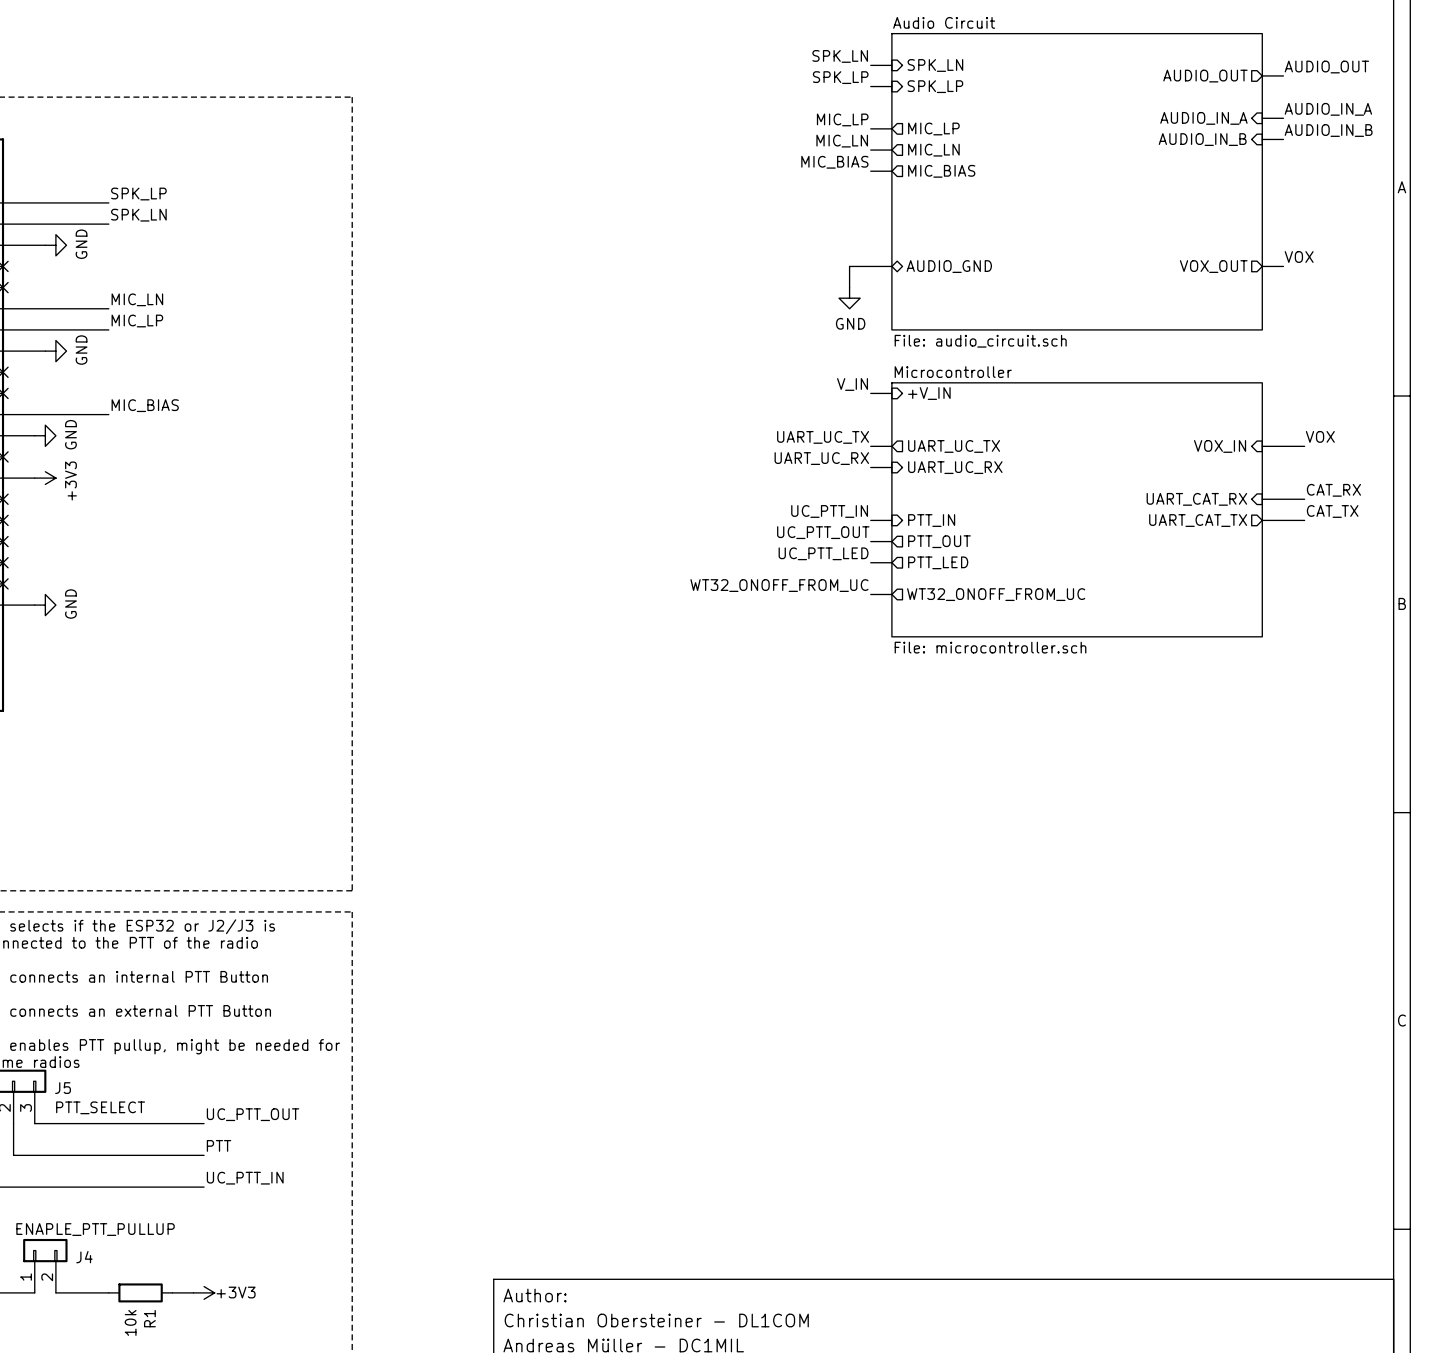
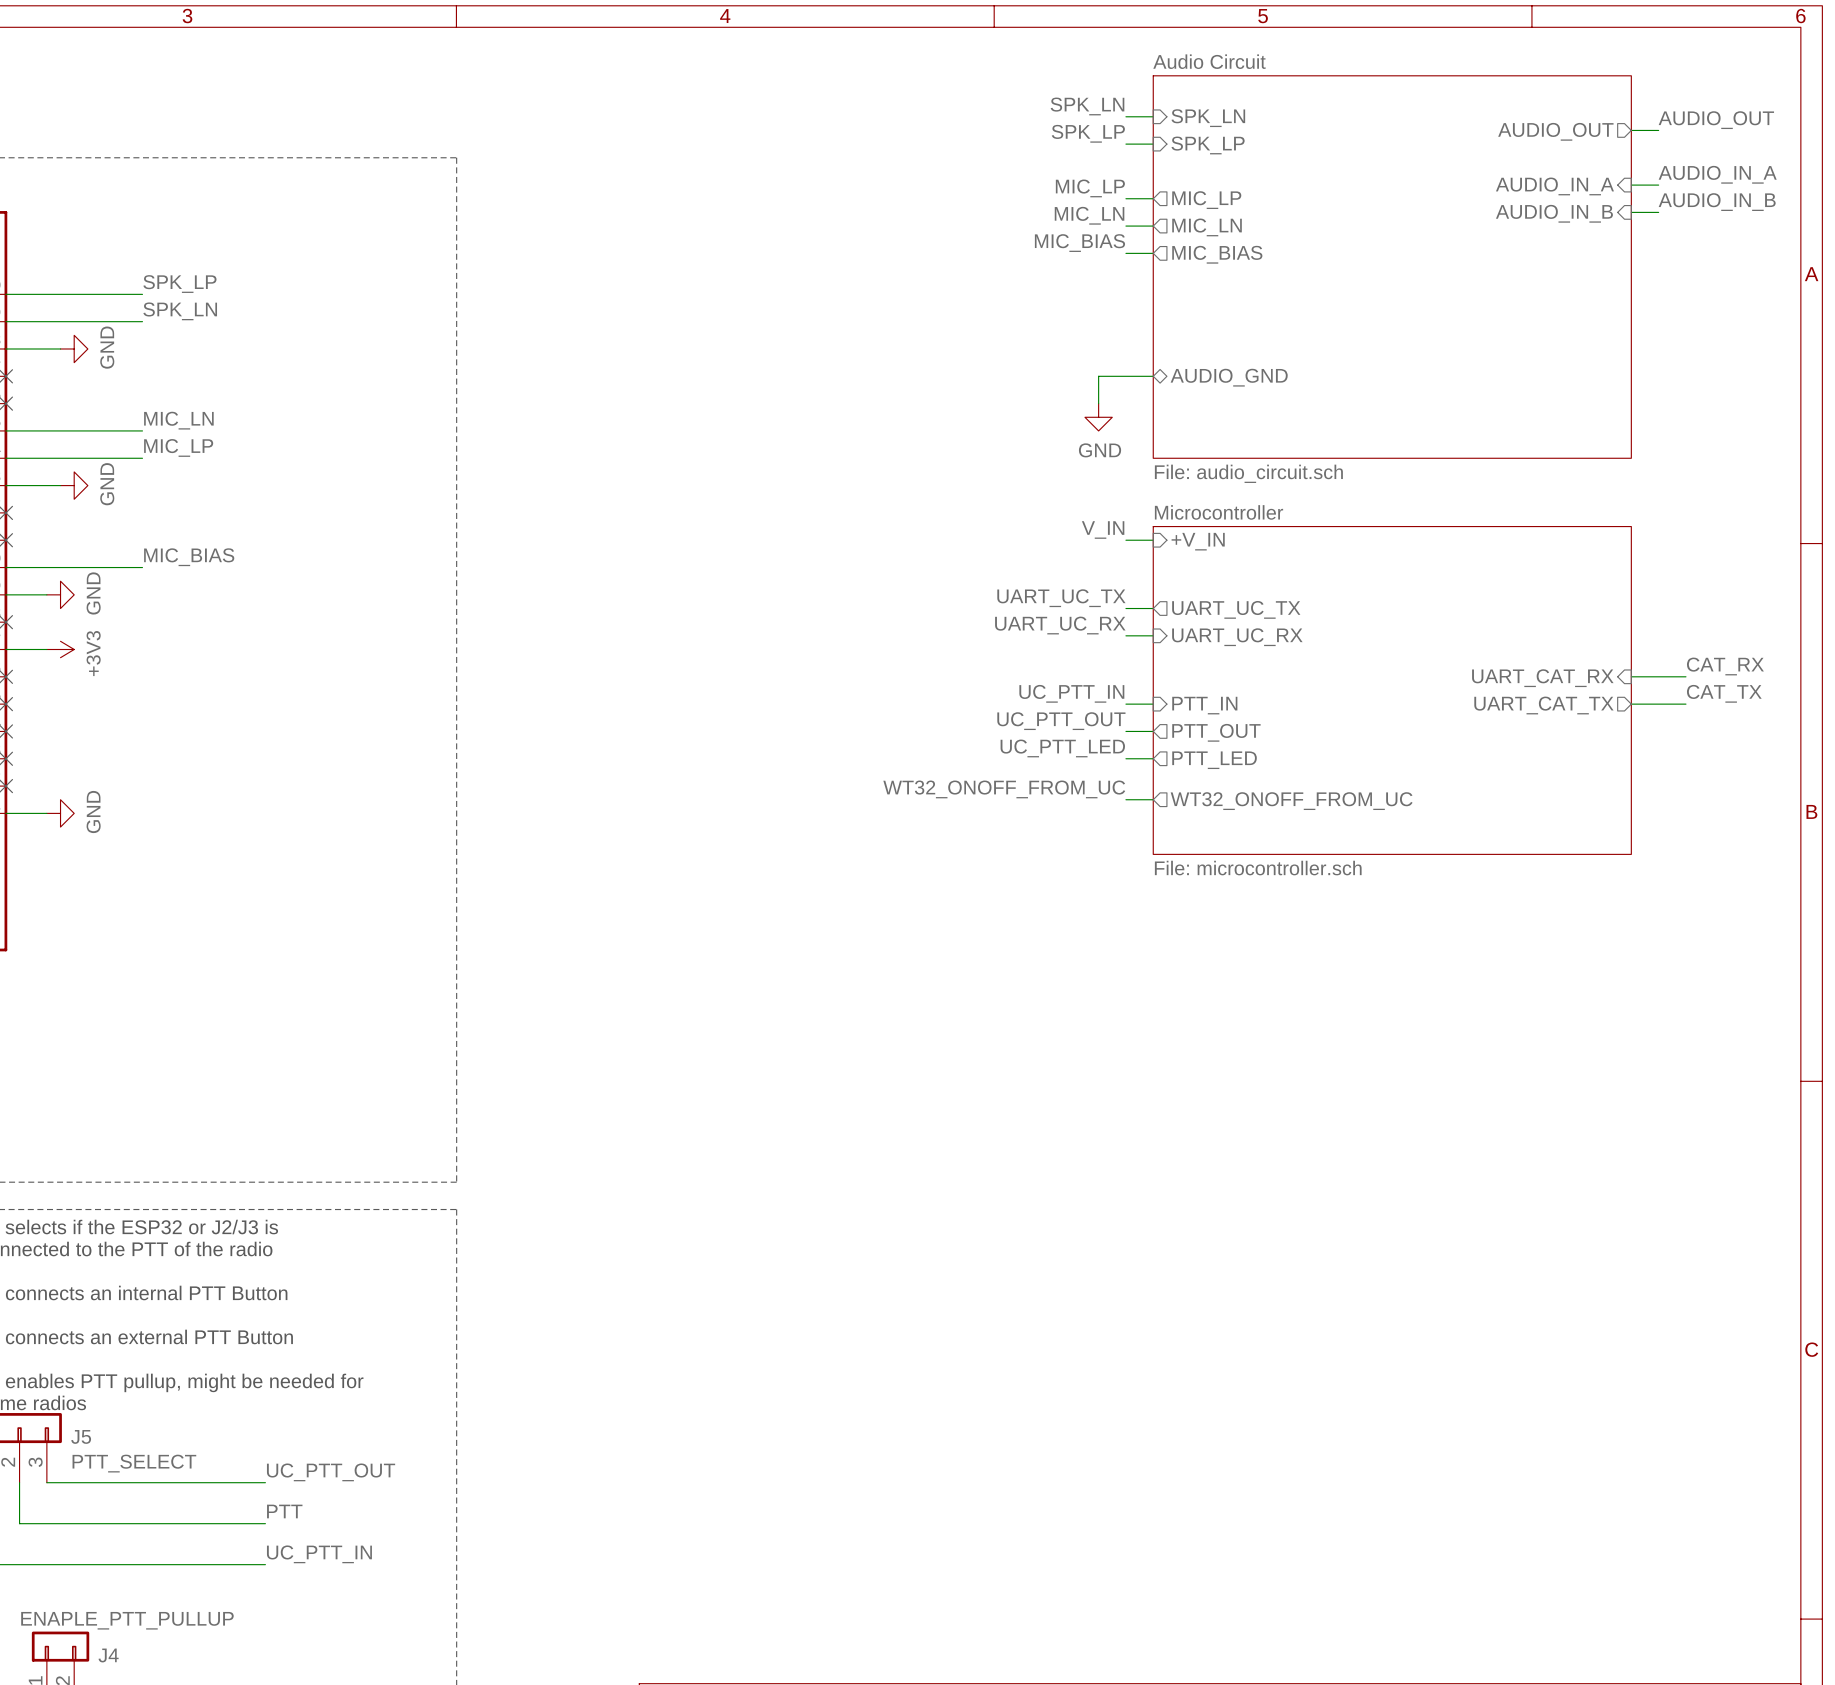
label: VOX (1299, 257) -> none
sheet pin: VOX_OUT (1213, 266) -> none
wire: (1262, 266) (1283, 266) -> none
label: VOX (1320, 436) -> none
sheet pin: VOX_IN (1220, 446) -> none
wire: (1262, 446) (1304, 446) -> none

